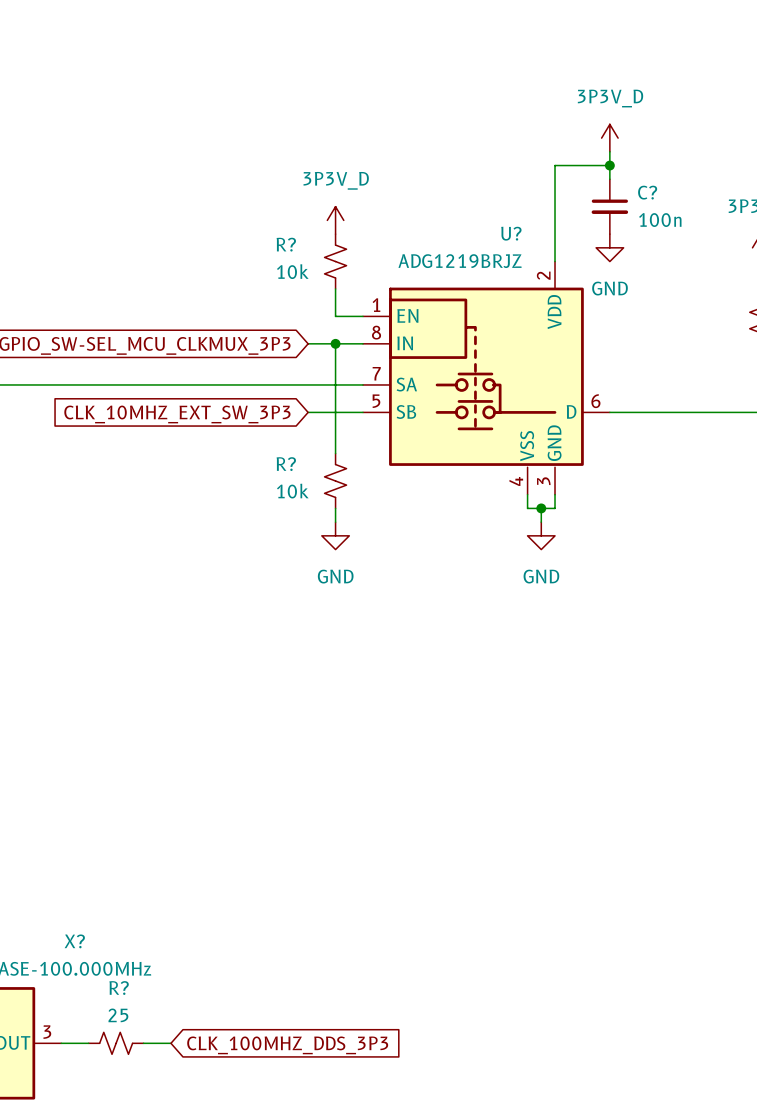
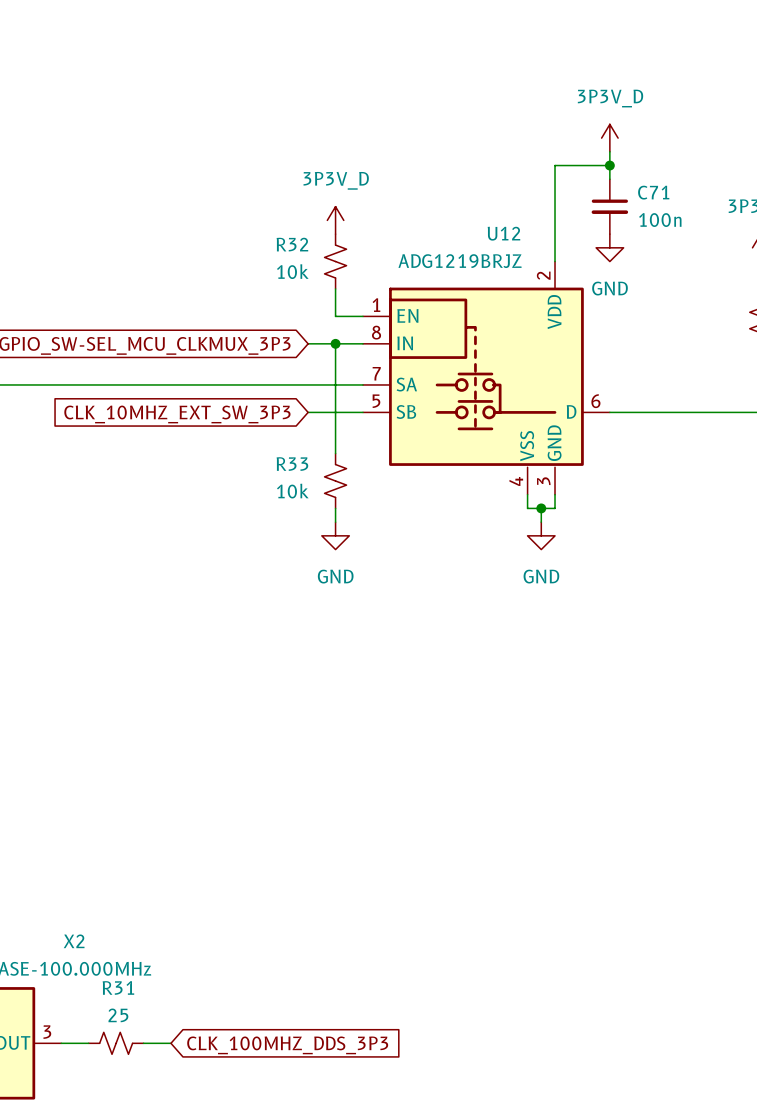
C? name: C? (647, 192) -> C71 (653, 192)
U? name: U? (511, 233) -> U12 (503, 233)
R? name: R? (286, 244) -> R32 (292, 244)
R? name: R? (286, 464) -> R33 (292, 464)
X? name: X? (74, 941) -> X2 (74, 941)
R? name: R? (119, 988) -> R31 (118, 987)

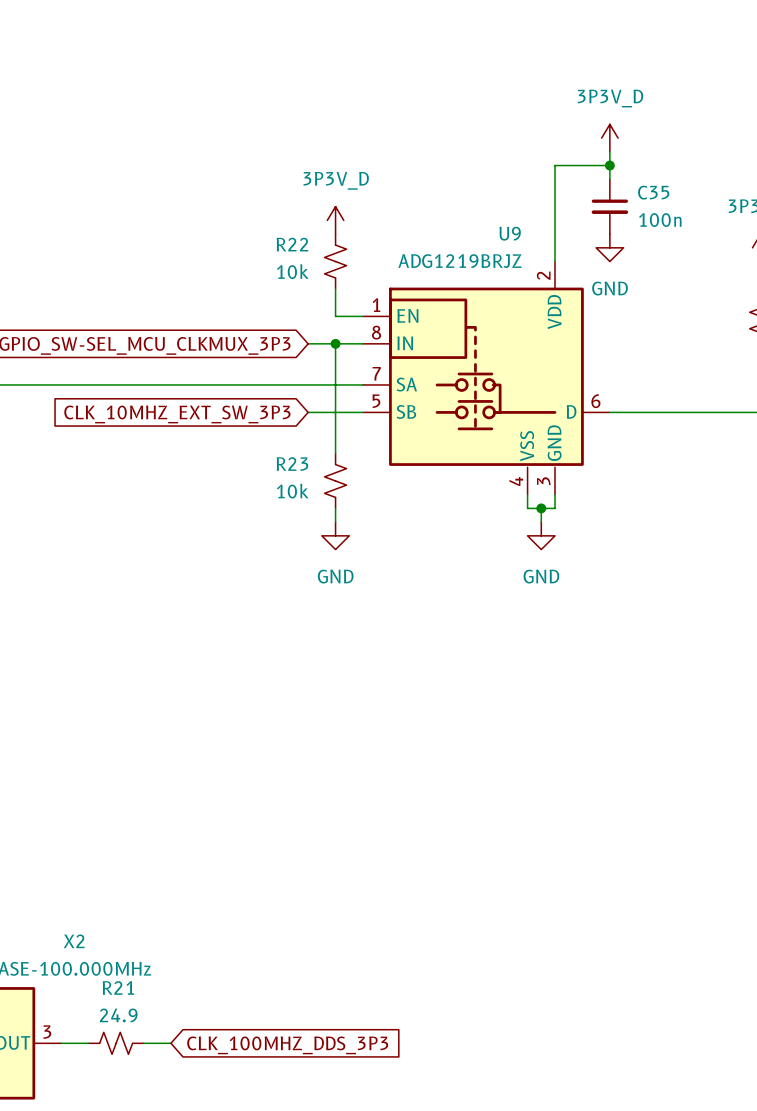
C71 name: C71 (653, 192) -> C35 (653, 192)
U12 name: U12 (503, 233) -> U9 (510, 233)
R32 name: R32 (292, 244) -> R22 (292, 244)
R33 name: R33 (292, 464) -> R23 (292, 464)
R31 name: R31 (118, 987) -> R21 (118, 987)
R31 value: 25 (118, 1015) -> 24.9 (118, 1015)

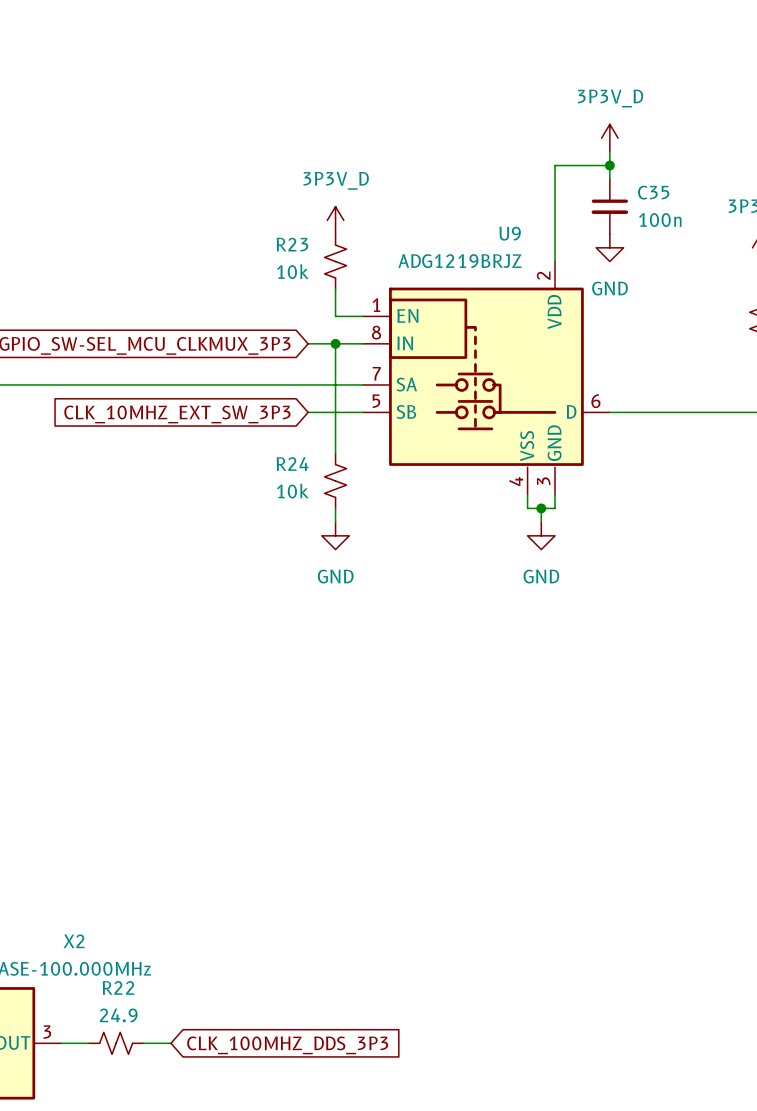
R22 name: R22 (292, 244) -> R23 (292, 244)
R23 name: R23 (292, 464) -> R24 (292, 464)
R21 name: R21 (118, 987) -> R22 (118, 987)

